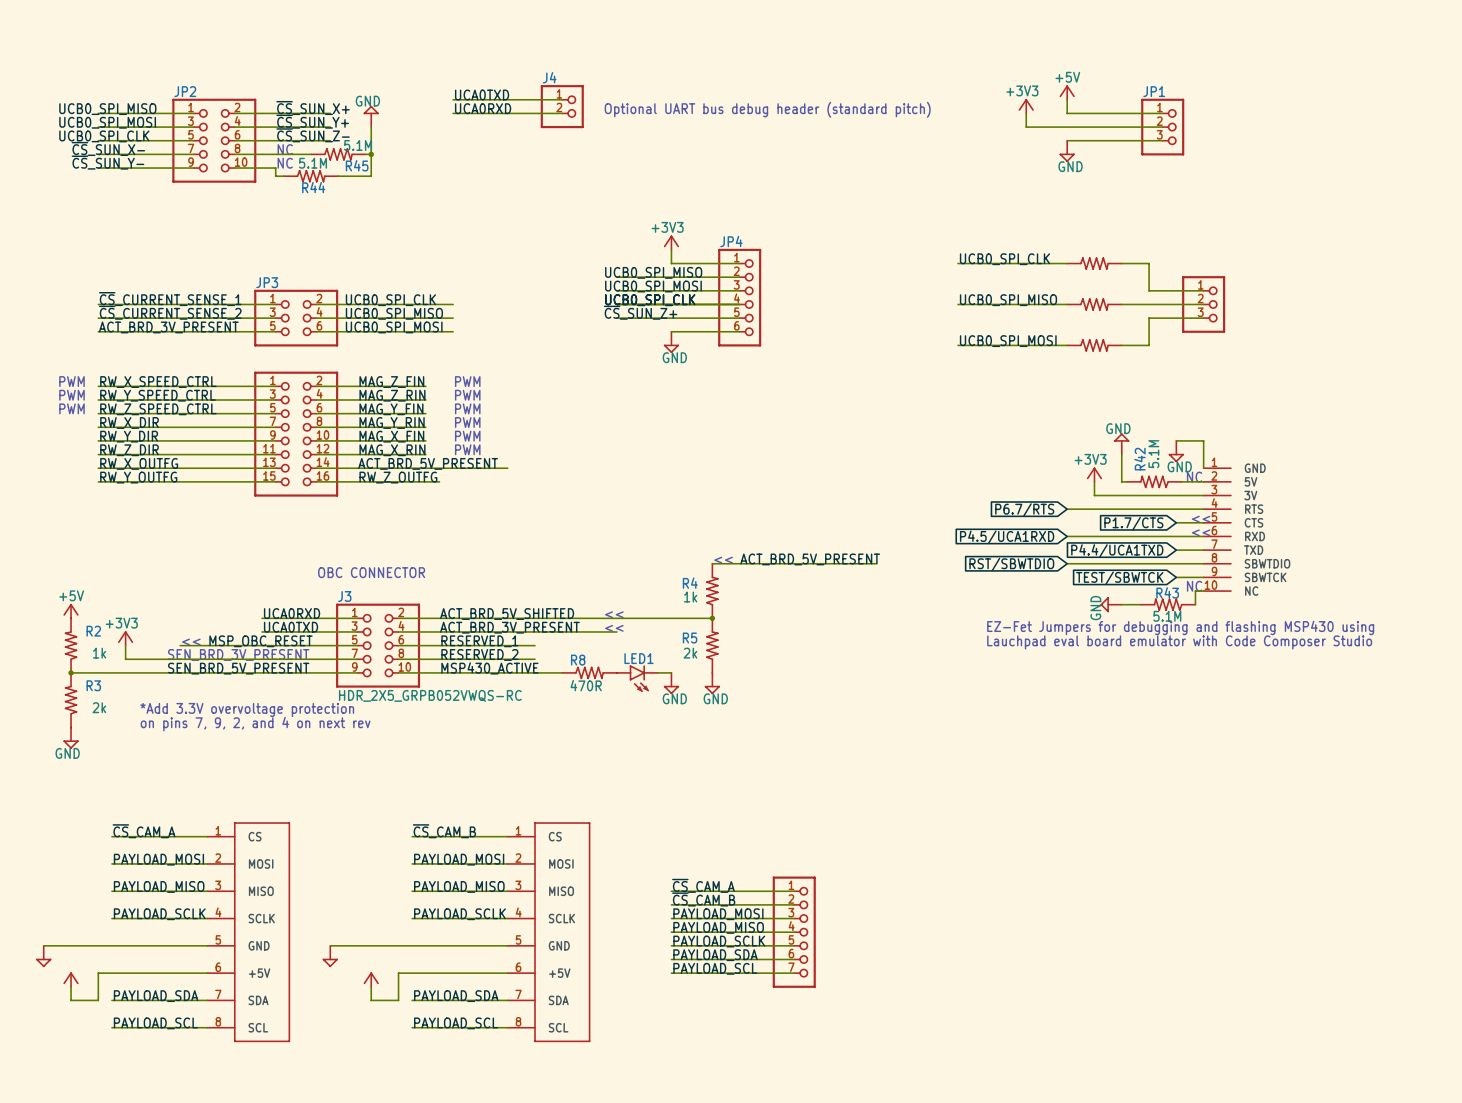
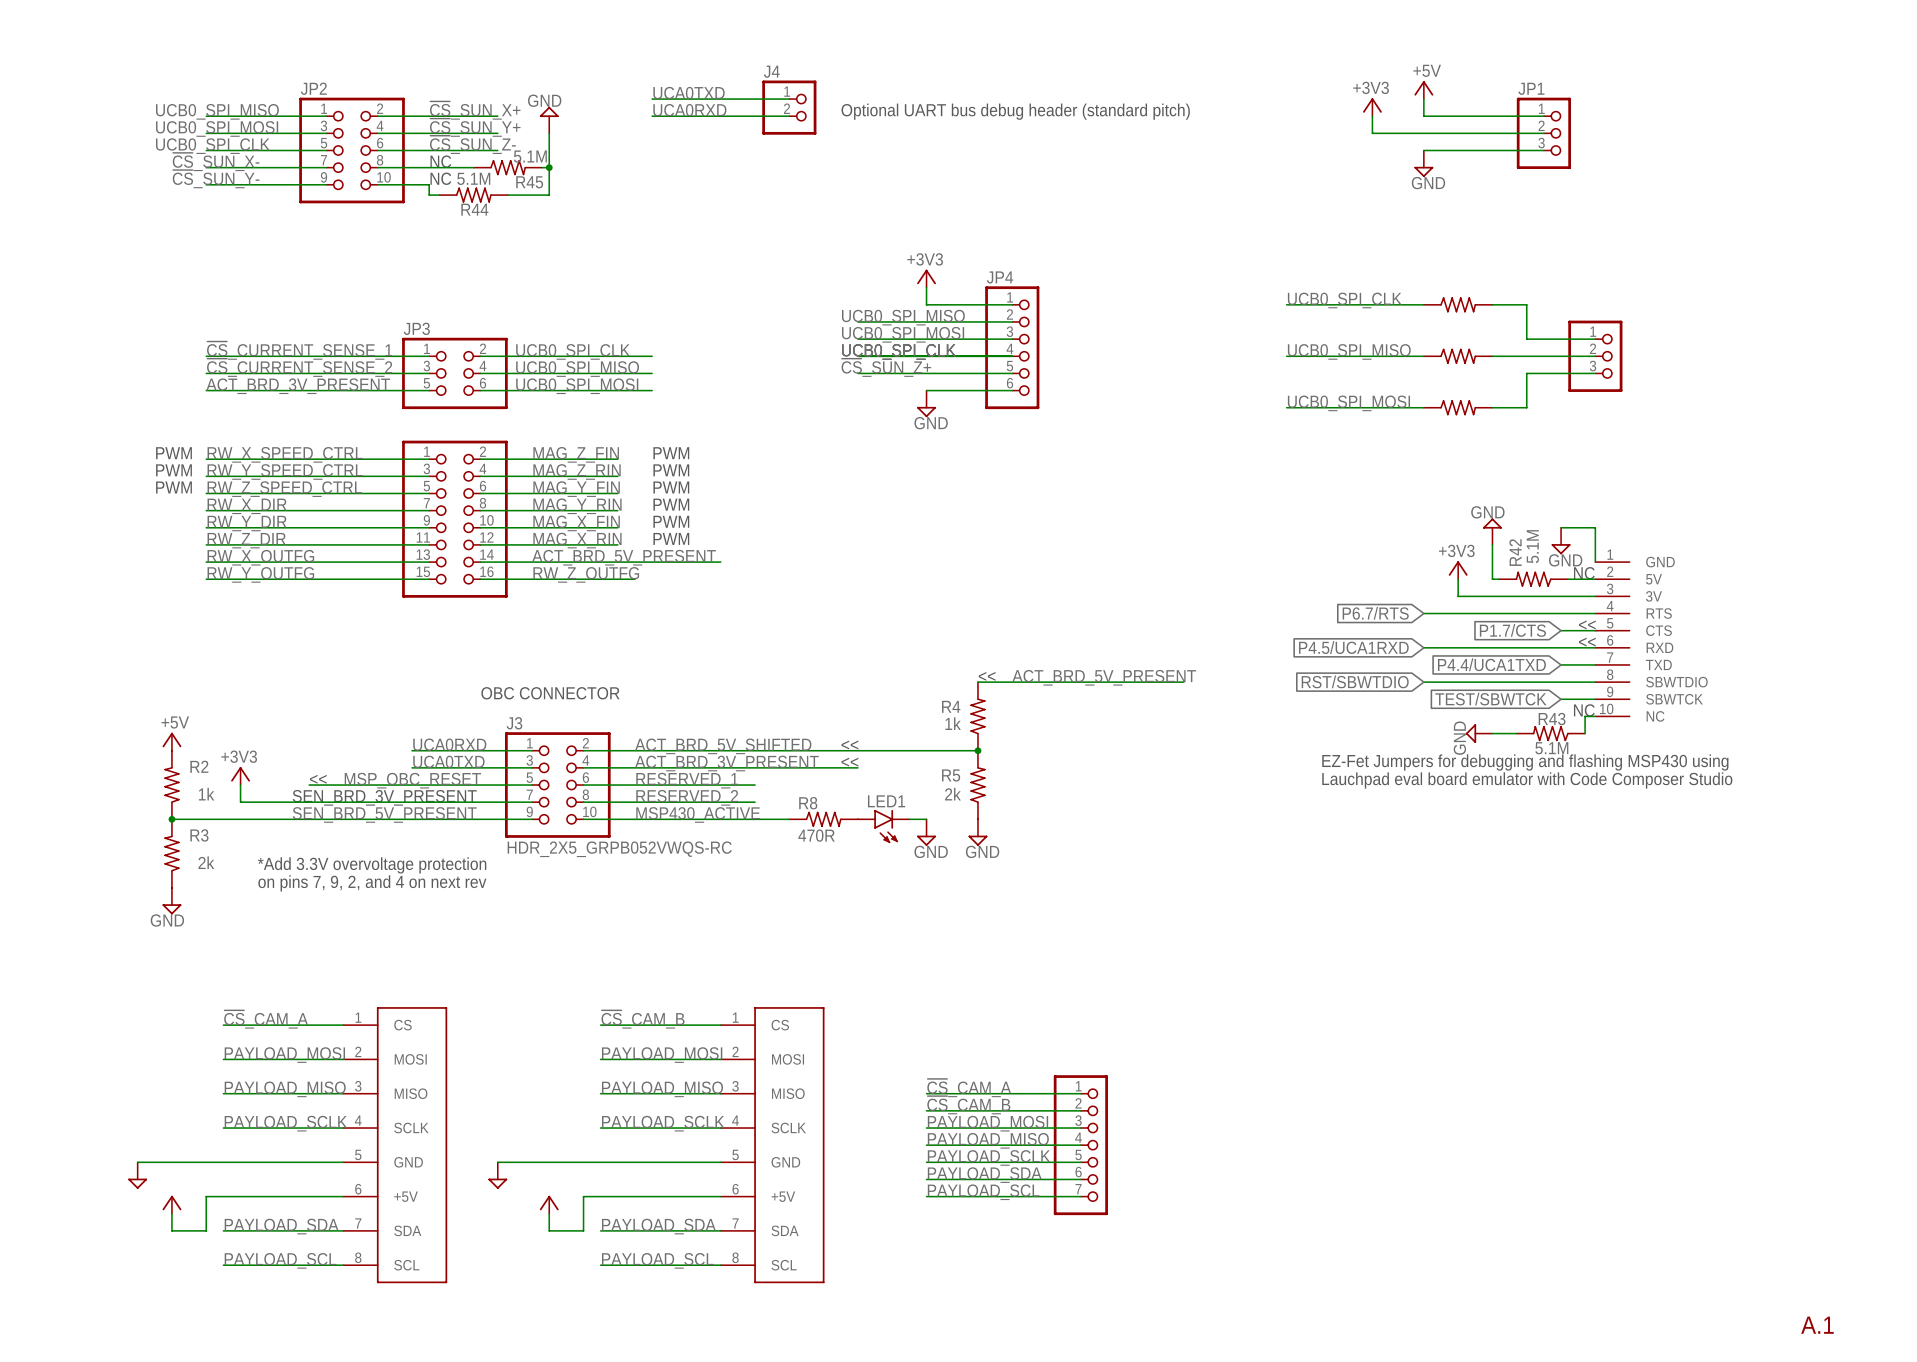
text: none -> A.1 (1817, 1325)

